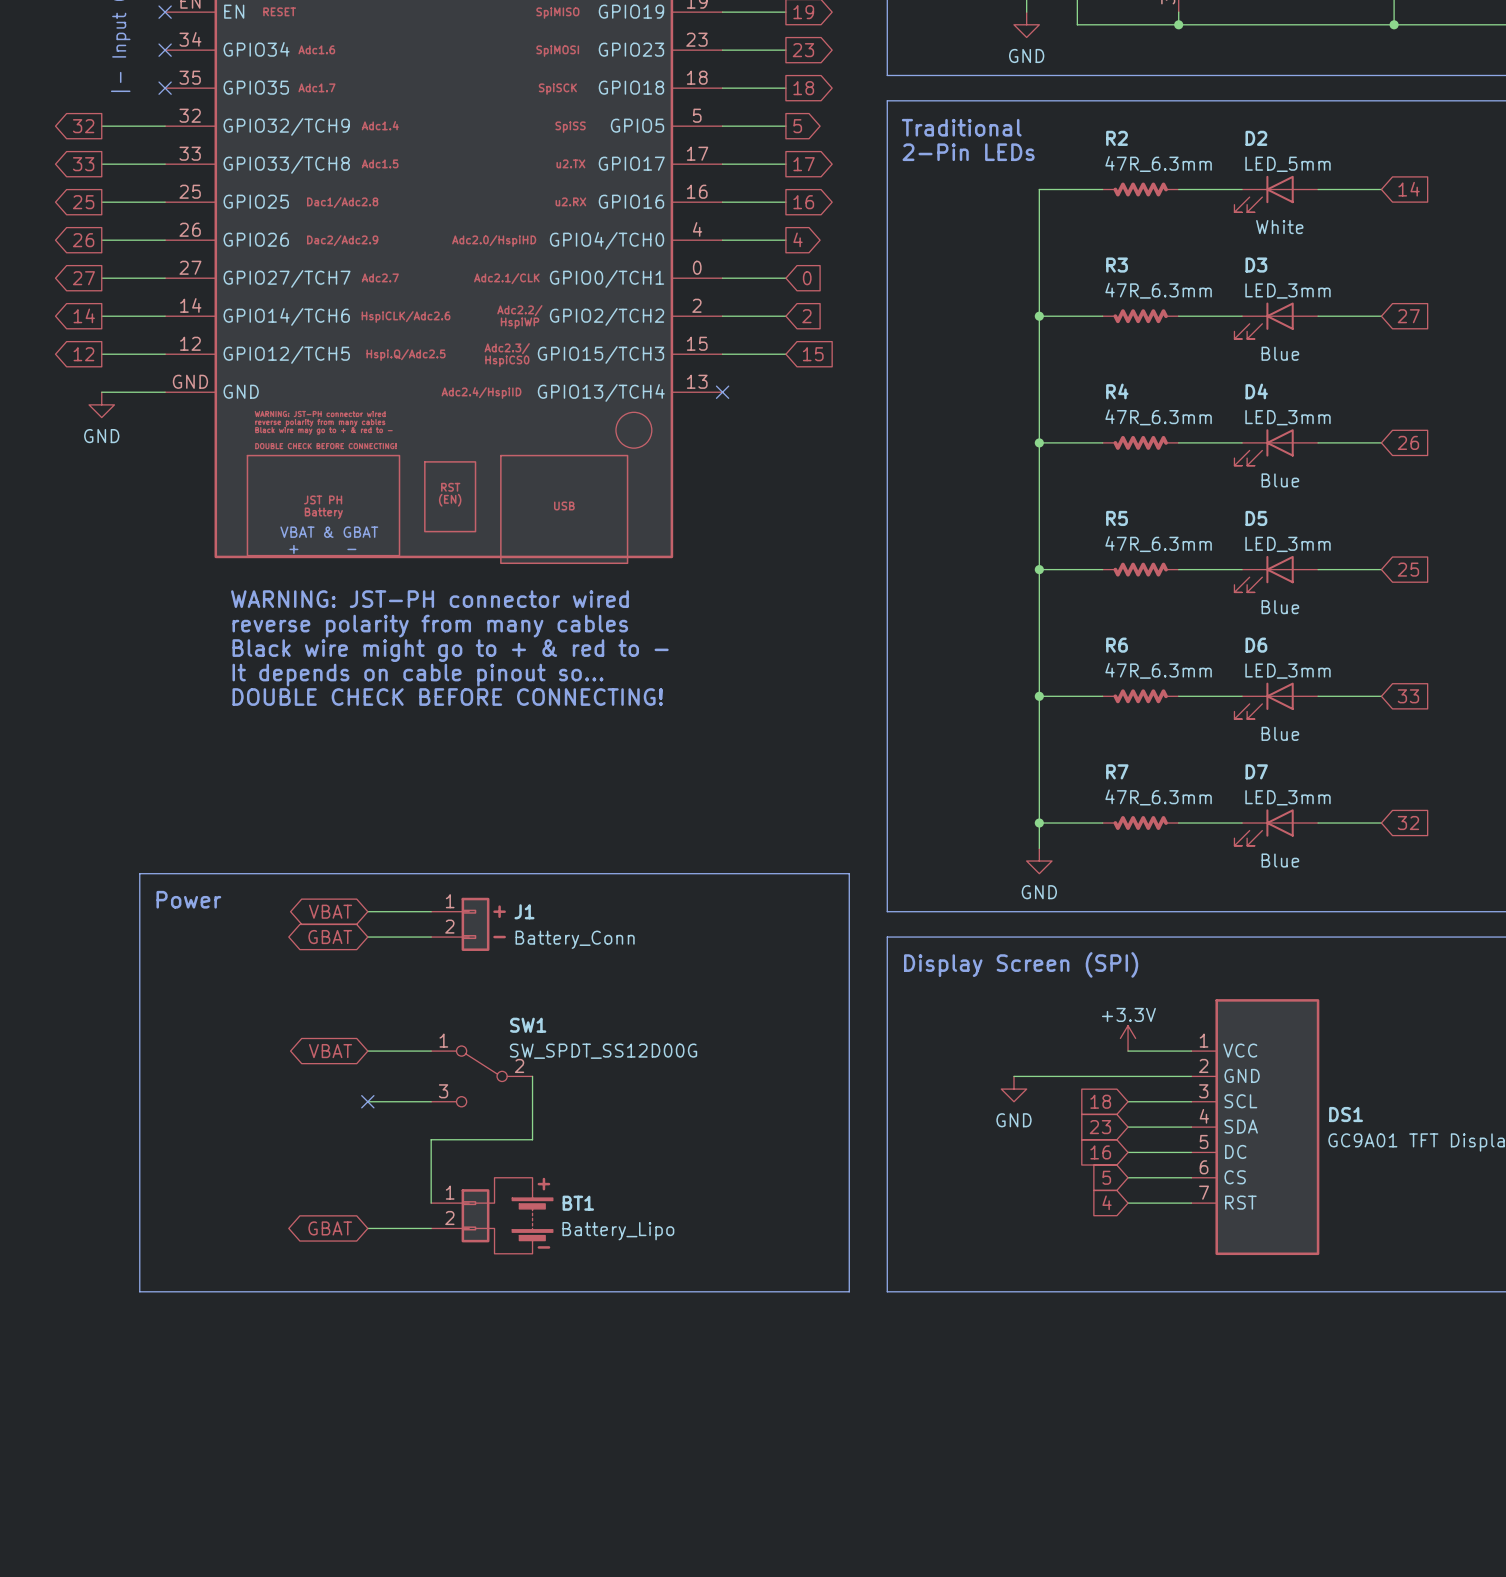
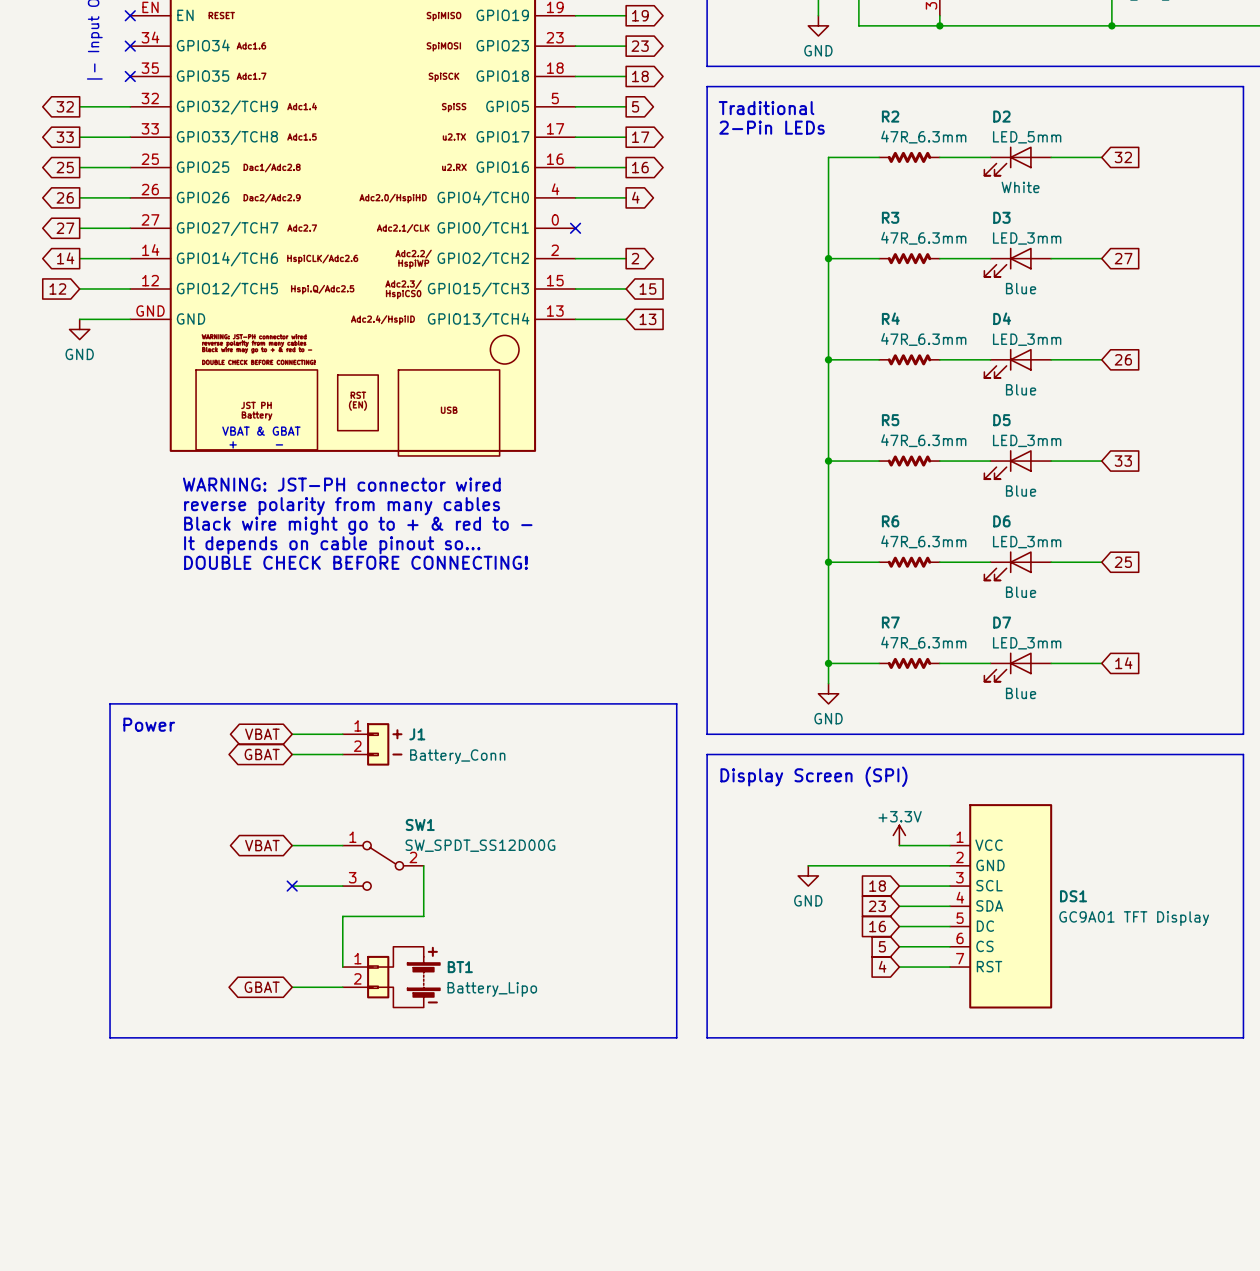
global label: 14 (1409, 189) -> 32 (1123, 157)
wire: (722, 278) (785, 278) -> (575, 319) (626, 319)
no-connect mark: none -> (575, 228)
global label: 0 (807, 278) -> none
global label shape: input (806, 316) -> output (635, 258)
global label shape: output (83, 354) -> input (57, 288)
no-connect mark: (722, 392) -> none
global label: none -> 13 (647, 319)
global label: 25 (1408, 569) -> 33 (1123, 461)
global label: 33 (1408, 696) -> 25 (1123, 562)
global label: 32 (1408, 823) -> 14 (1123, 663)

